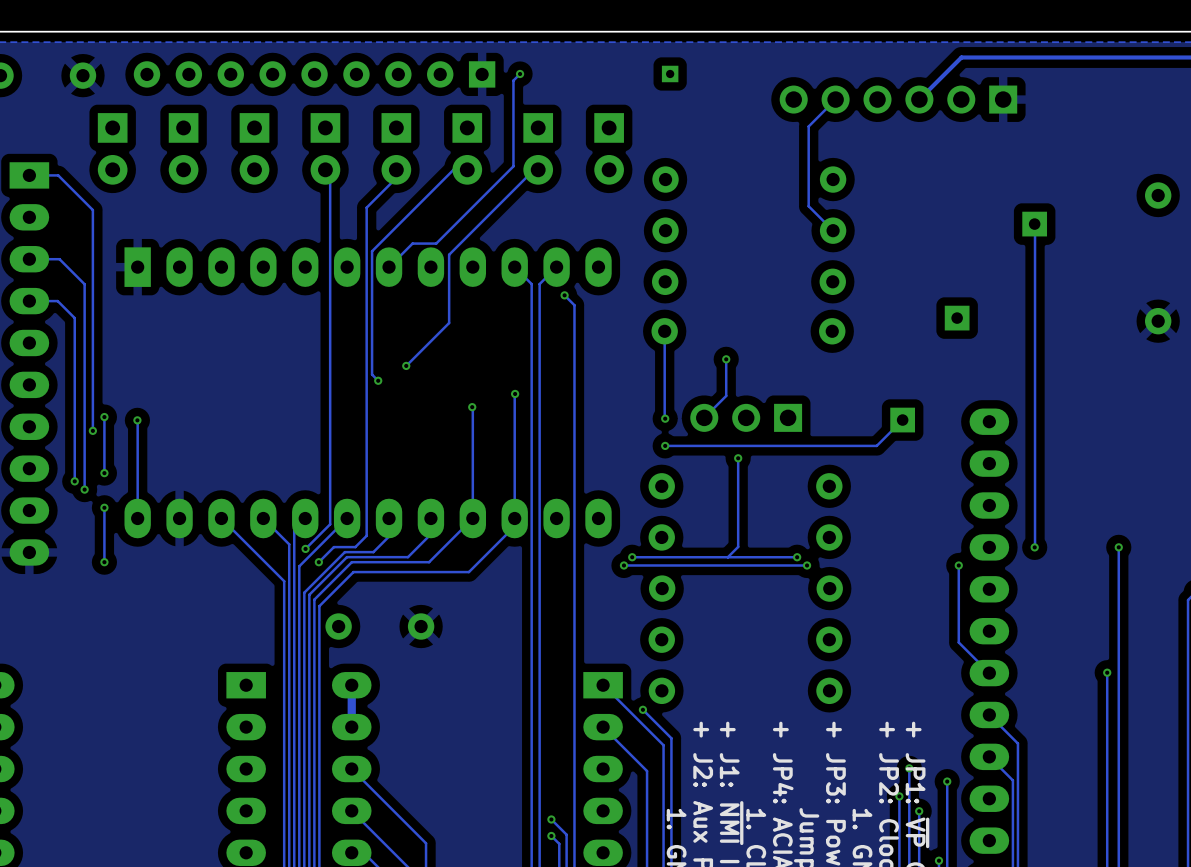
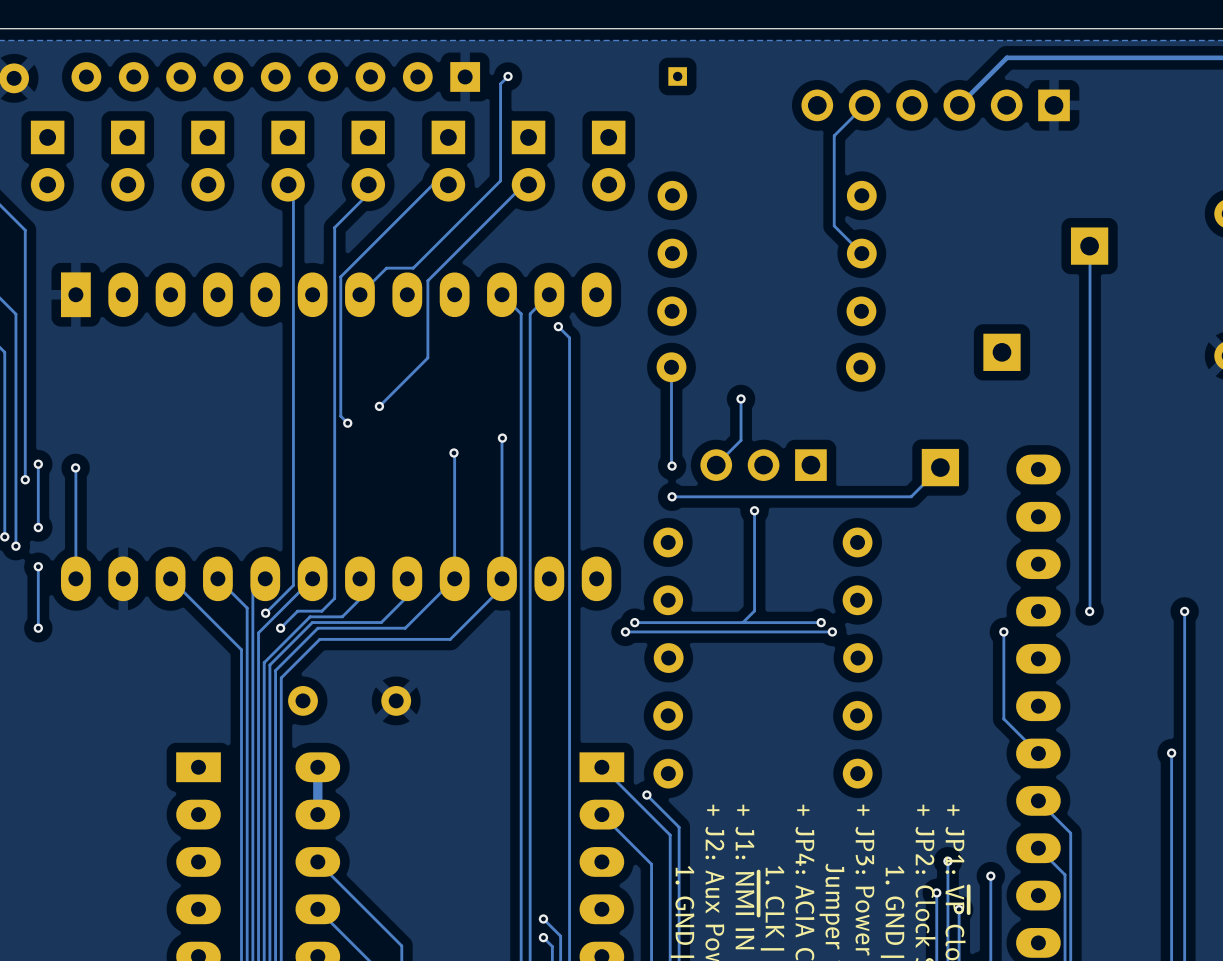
part footprint: [1022, 211, 1048, 237] -> [1070, 227, 1109, 265]
part footprint: [944, 305, 970, 331] -> [983, 333, 1021, 371]
part footprint: [890, 407, 916, 433] -> [921, 448, 960, 487]

